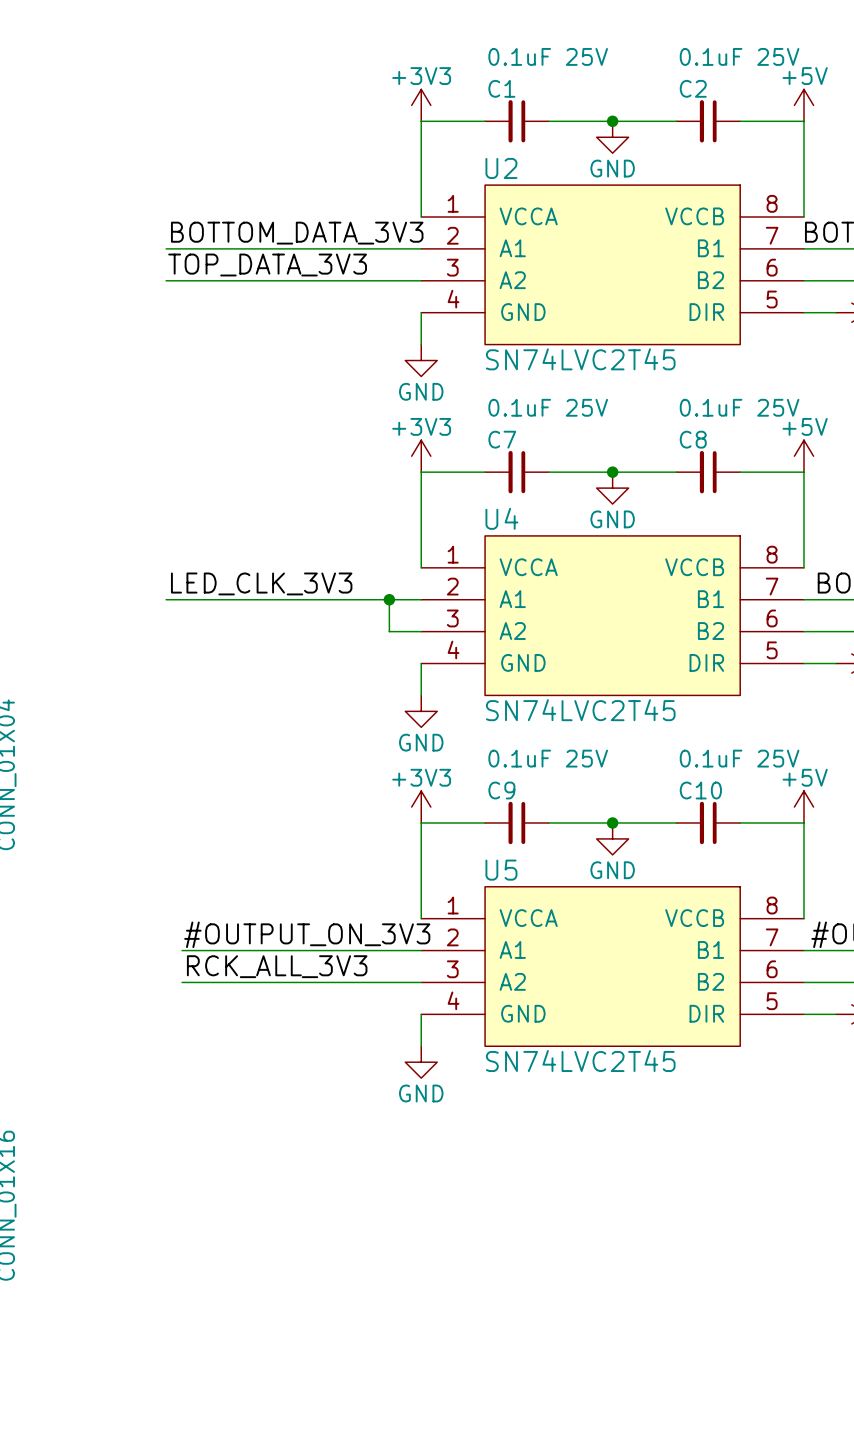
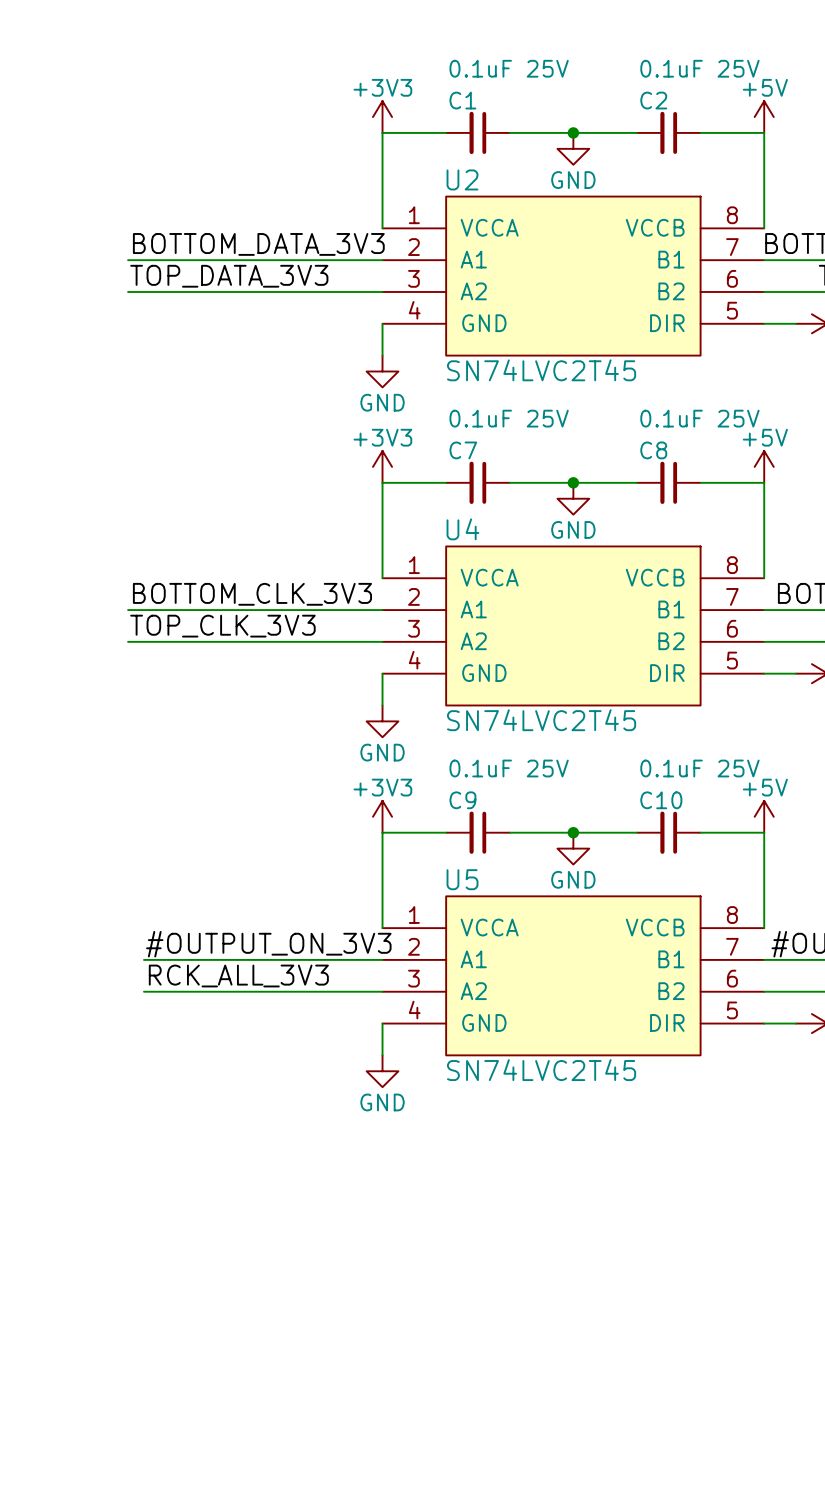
label: LED_CLK_3V3 (261, 583) -> BOTTOM_CLK_3V3 (252, 594)
wire: (389, 599) (389, 631) -> (128, 641) (350, 641)
junction: (389, 599) -> none
label: none -> TOP_CLK_3V3 (222, 626)

